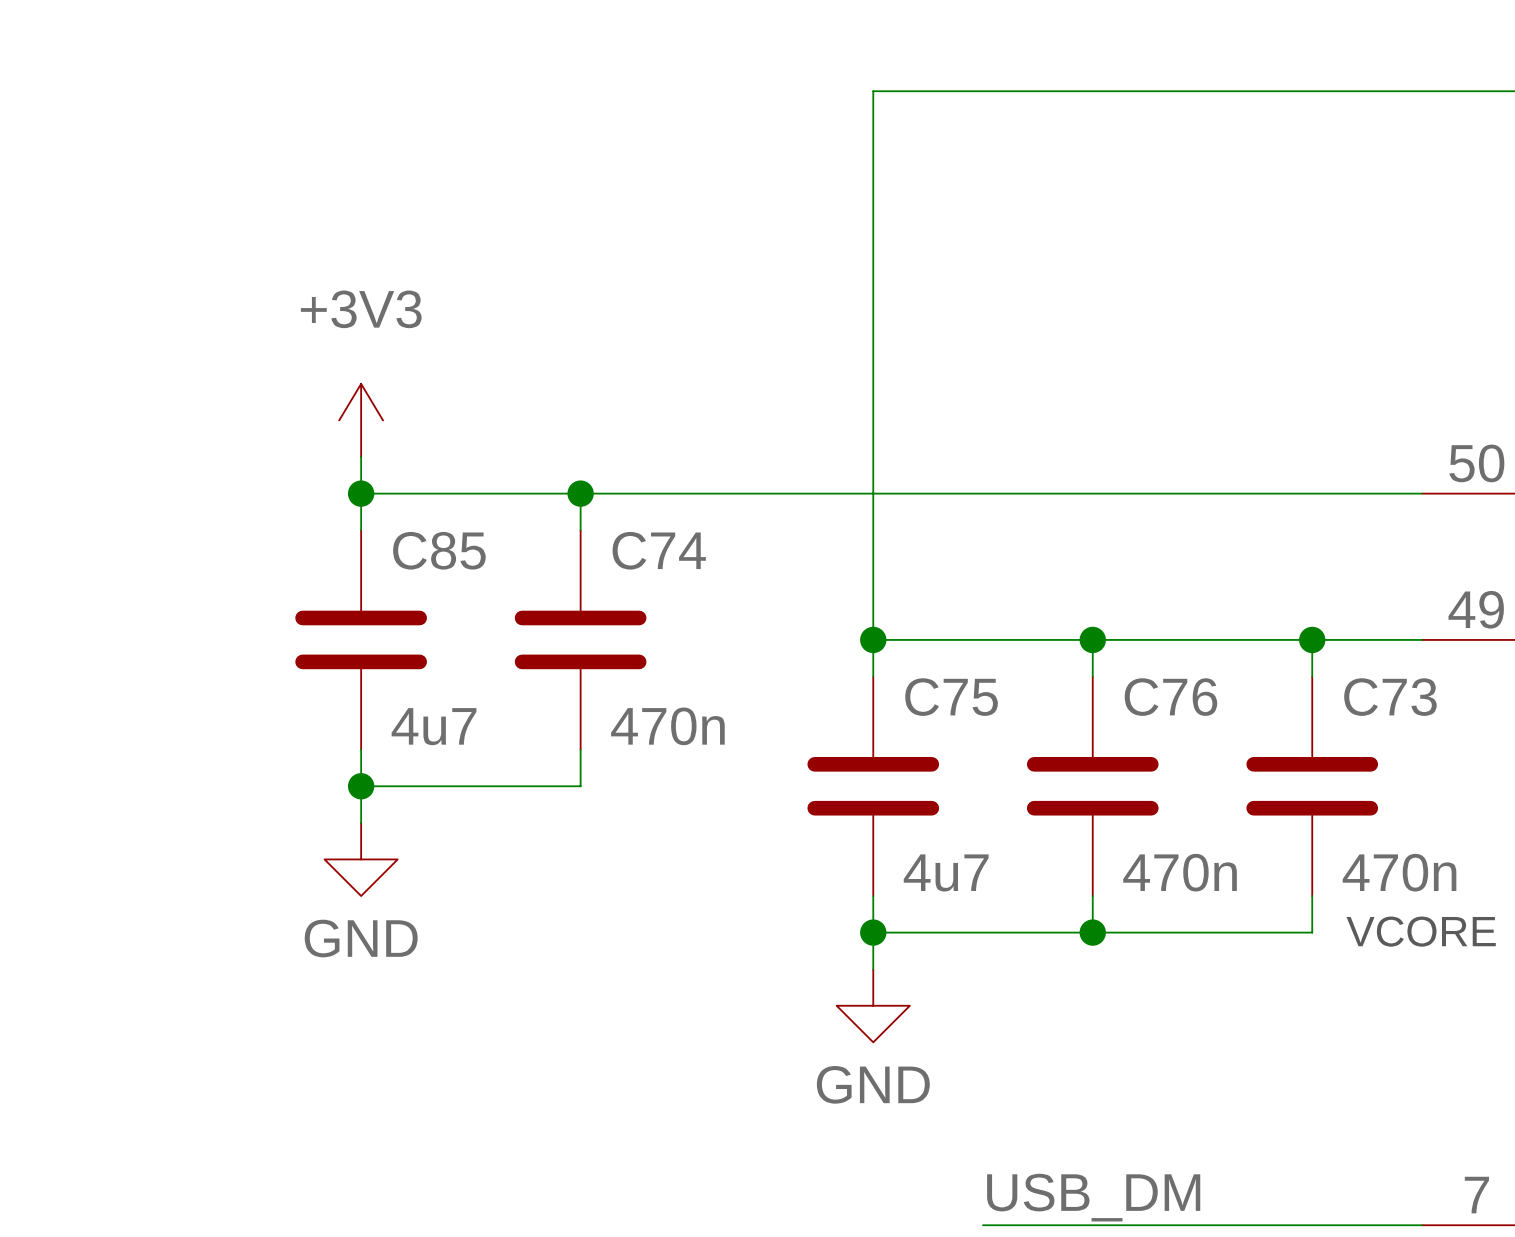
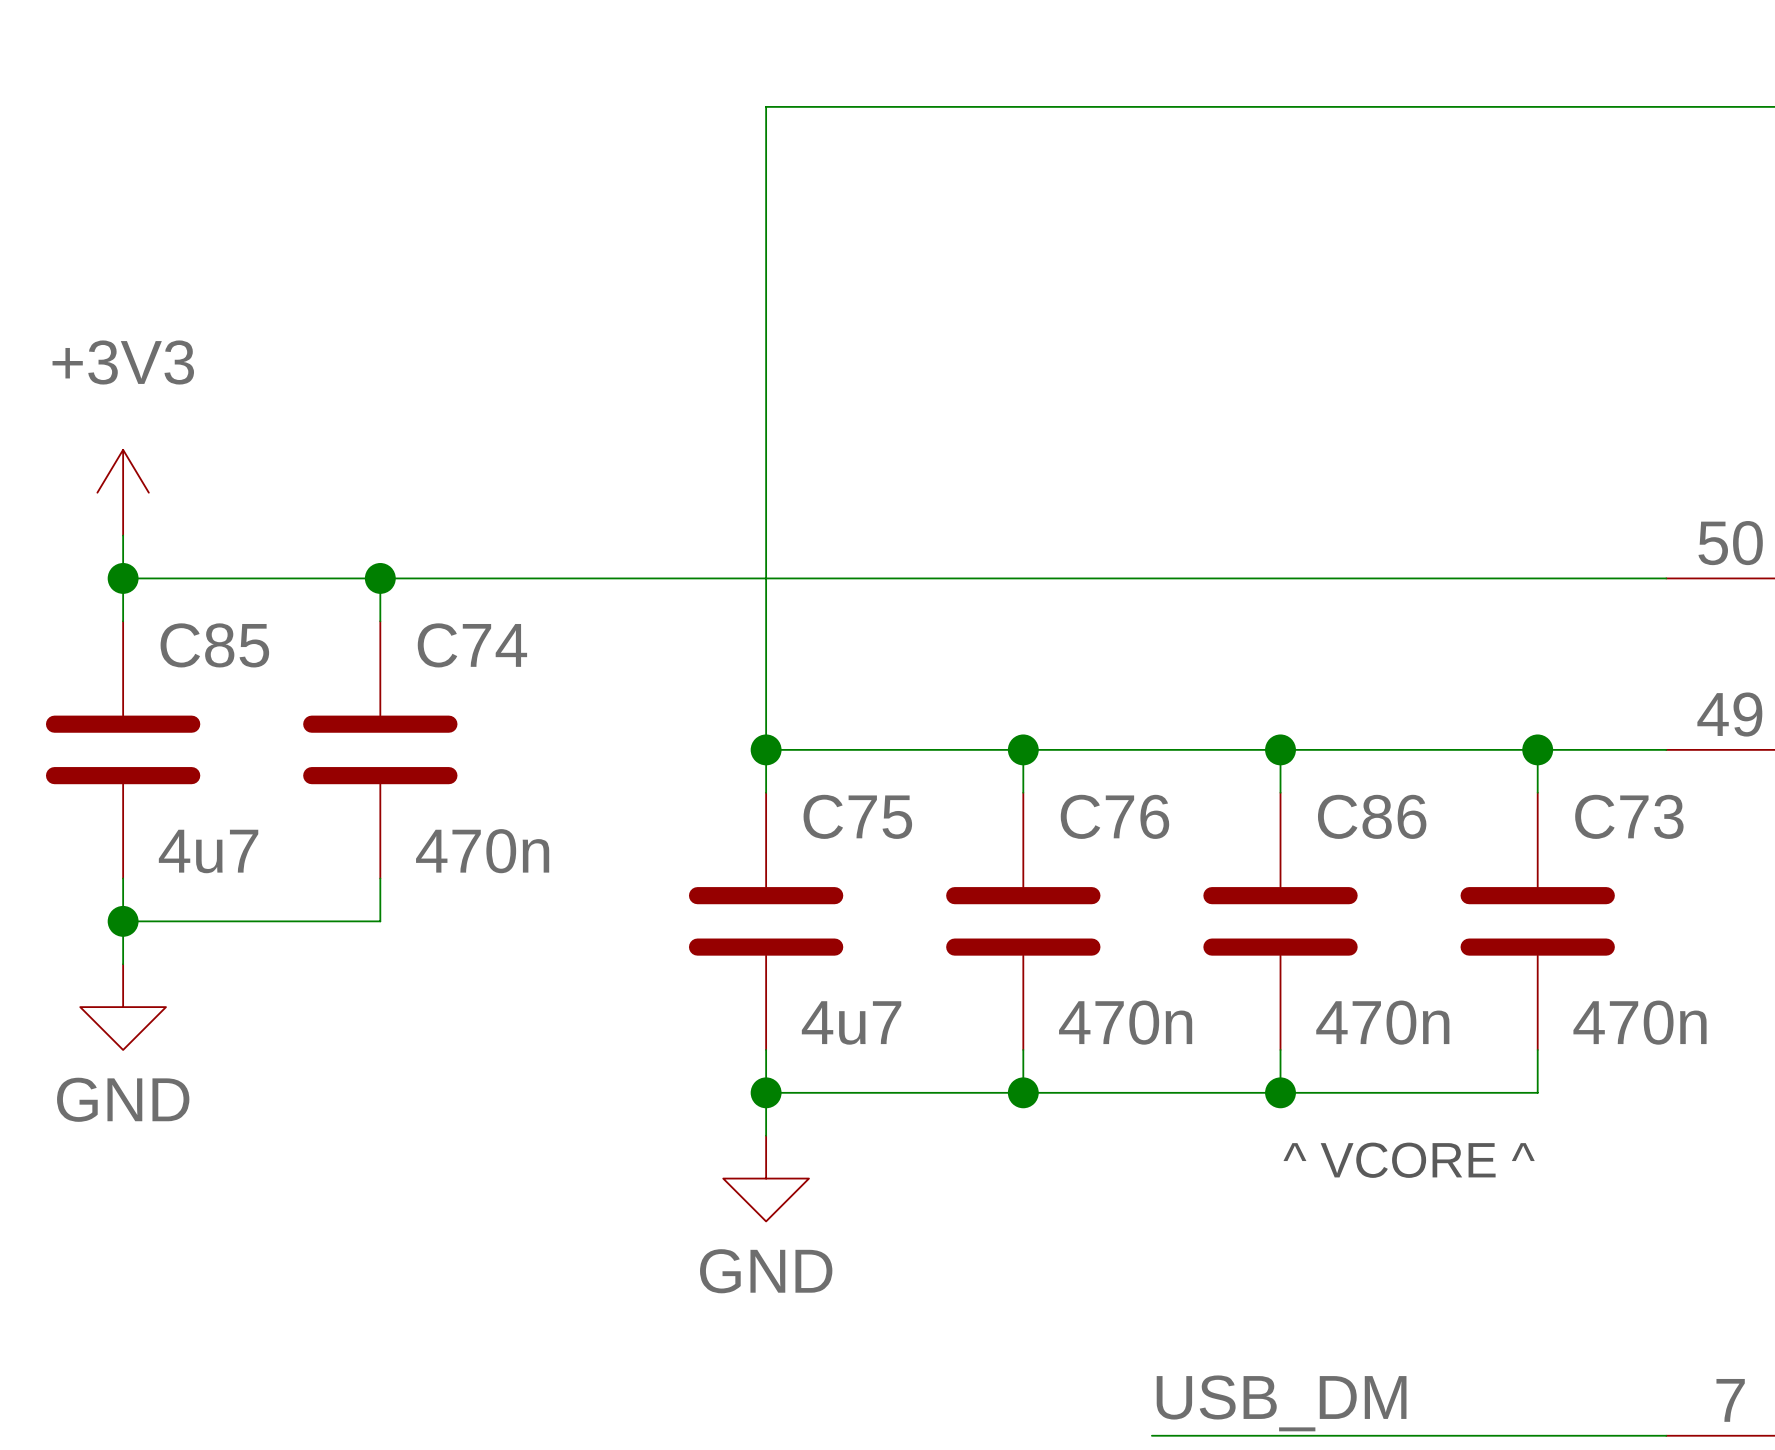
wire: (873, 91) (873, 639) -> (1023, 106) (766, 106) (766, 792)
power symbol position: +3V3 (361, 420) -> +3V3 (123, 492)
wire: (361, 457) (361, 530) -> (123, 535) (123, 621)
wire: none -> (123, 578) (423, 578)
junction: none -> (123, 578)
junction position: (361, 493) -> (380, 578)
wire: (580, 493) (580, 530) -> (380, 578) (380, 621)
junction: (580, 493) -> none
C85 position: (361, 639) -> (123, 749)
C74 position: (580, 639) -> (380, 749)
wire: none -> (766, 749) (1023, 749)
junction: none -> (766, 749)
C75 name: C75 (951, 697) -> C76 (1114, 816)
C76 name: C76 (1170, 697) -> C86 (1372, 816)
wire: (361, 749) (361, 822) -> (123, 878) (123, 964)
wire: (580, 749) (580, 786) (361, 786) -> (380, 878) (380, 921) (123, 921)
junction: none -> (123, 921)
junction: (361, 786) -> none
C75: none -> 4u7 (766, 921)
power symbol: none -> GND (123, 1007)
power symbol: GND (361, 859) -> none
C75 value: 4u7 (946, 872) -> 470n (1125, 1022)
wire: none -> (766, 1049) (766, 1135)
text: VCORE (1421, 931) -> ^ VCORE ^ (1409, 1160)
junction: none -> (766, 1092)
wire: (873, 932) (873, 969) -> (1023, 1092) (766, 1092)
power symbol: none -> GND (766, 1178)
power symbol: GND (873, 1005) -> none

